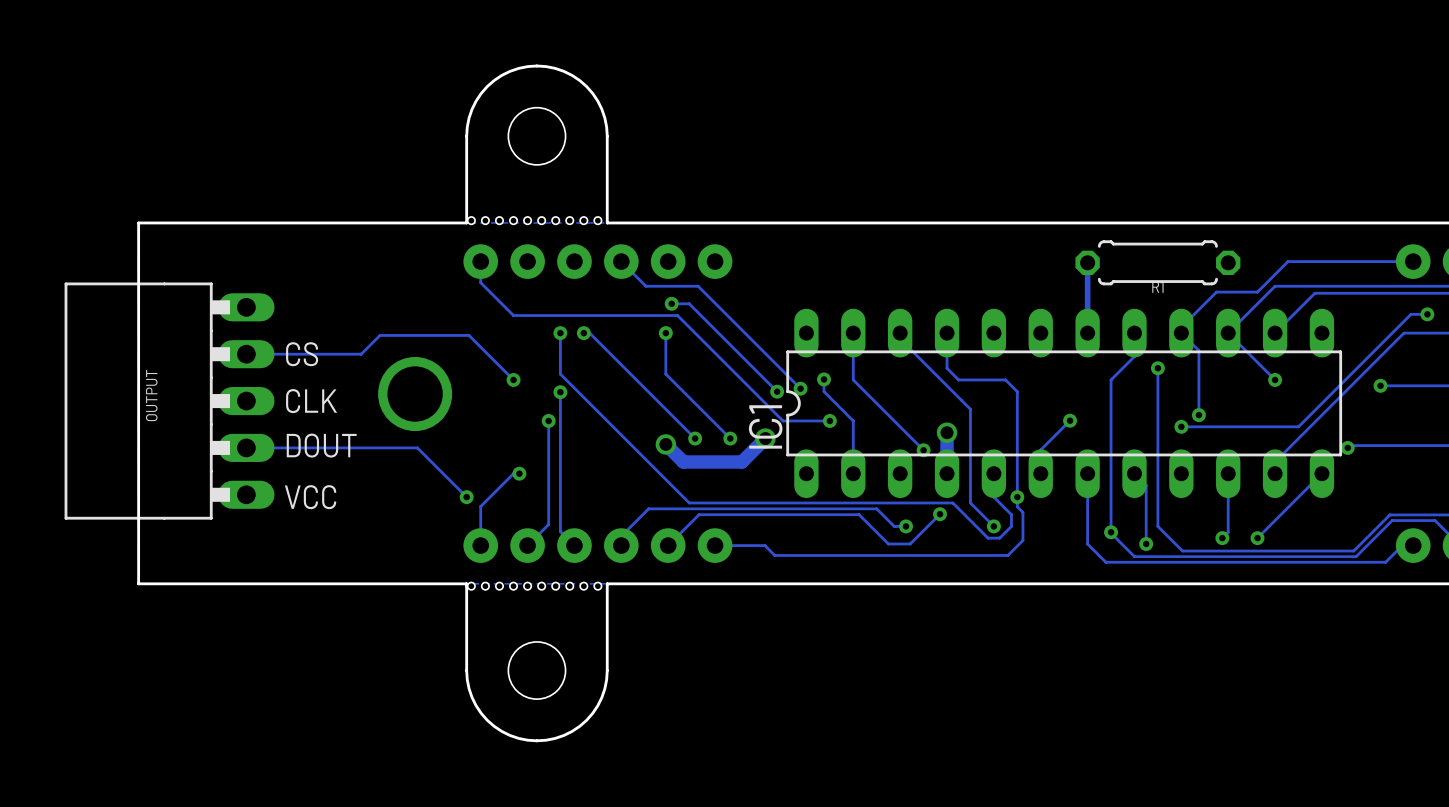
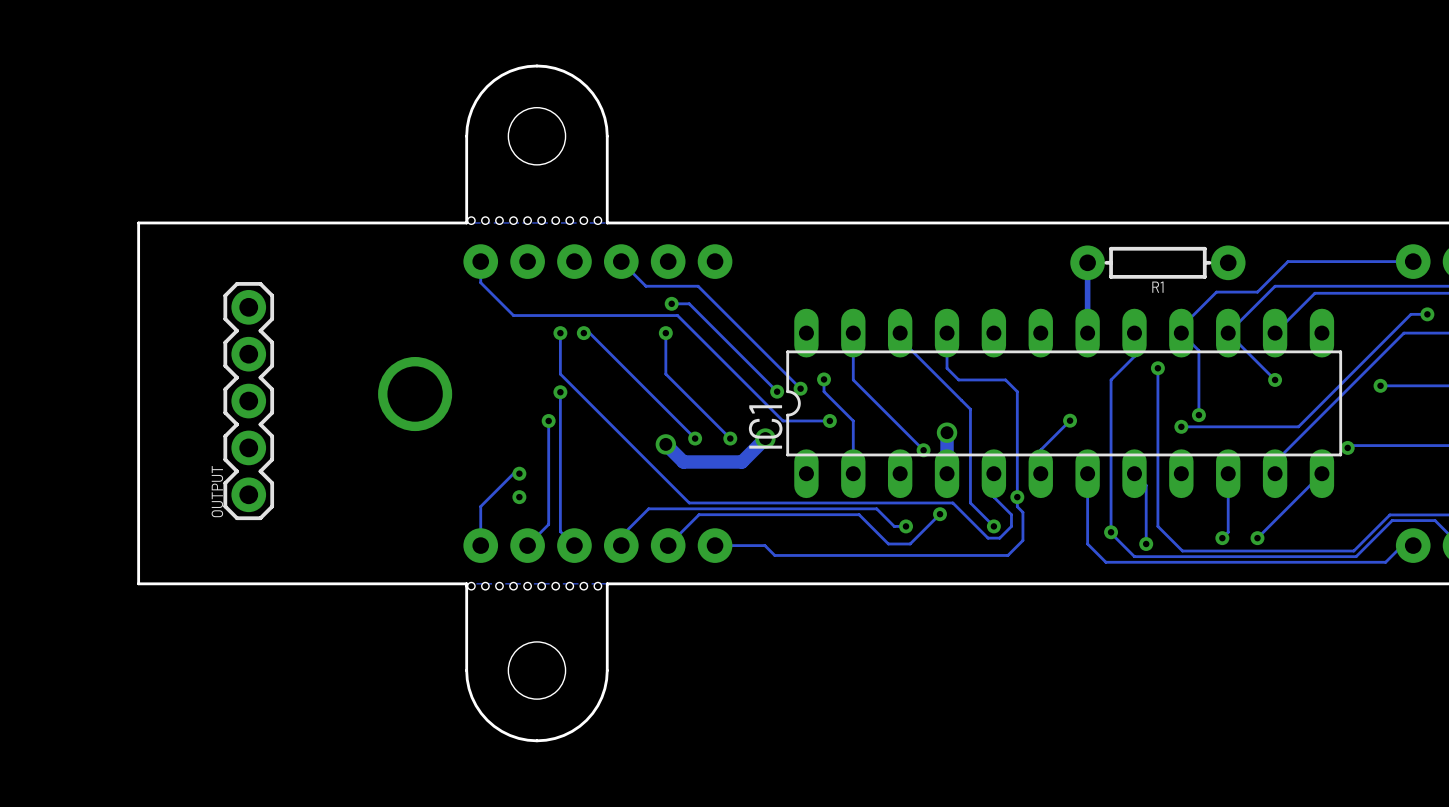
R1 footprint: [1075, 240, 1241, 286] -> [1070, 245, 1246, 281]
track: (246, 354) (361, 354) (379, 335) (469, 335) (513, 379) -> none
text: CS (302, 354) -> none
via: (513, 379) -> none
OUTPUT: (169, 401) -> none
OUTPUT: none -> (248, 401)
text: CLK (311, 401) -> none
text: DOUT (321, 445) -> none
track: (246, 447) (417, 447) (466, 497) -> none
text: VCC (310, 497) -> none
via position: (466, 497) -> (519, 497)

